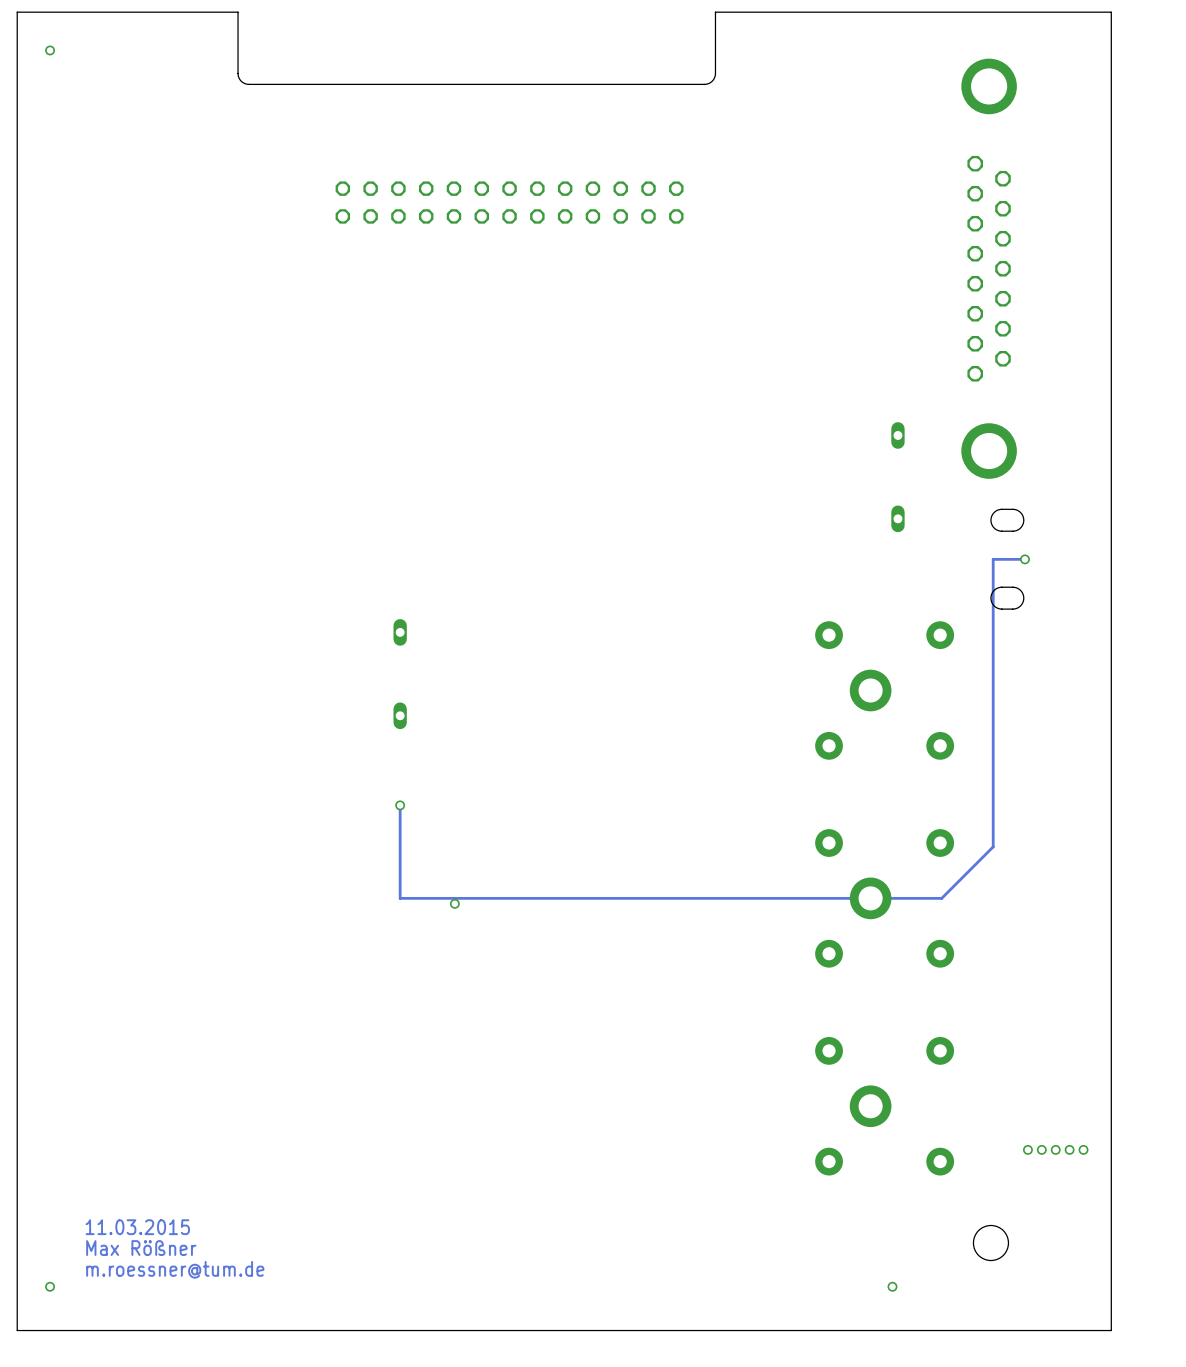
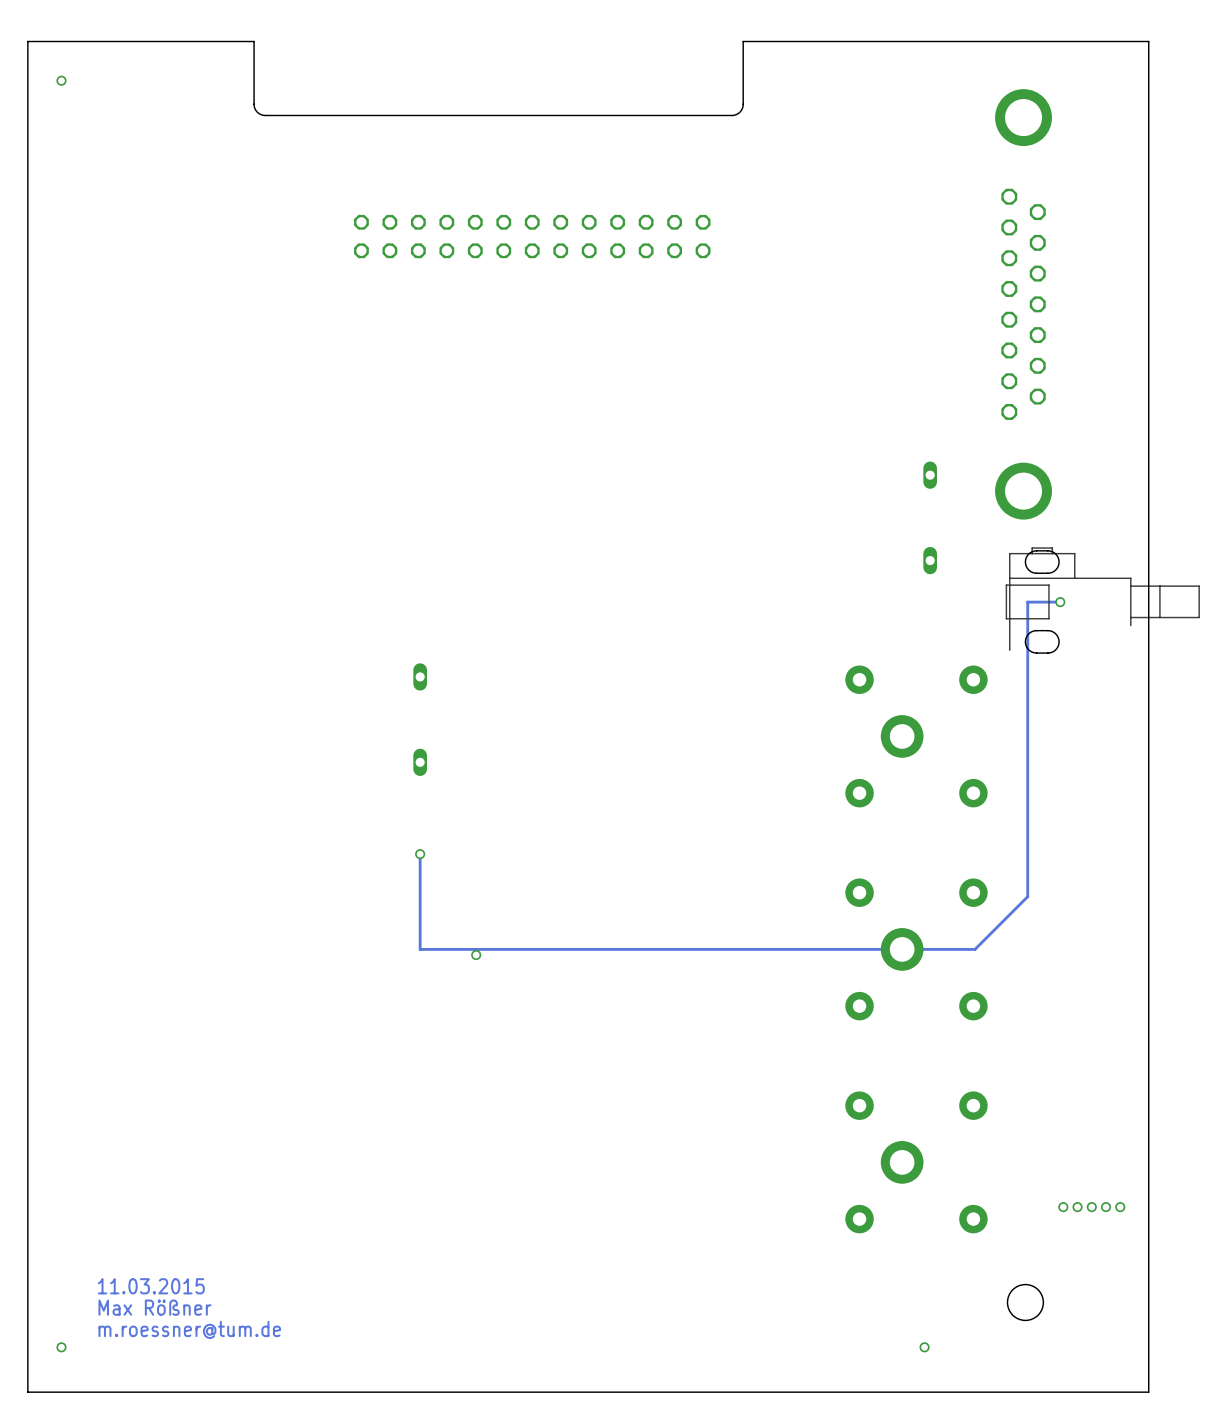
drawing: none -> [1005, 547, 1200, 654]
drawing: [990, 509, 1024, 610] -> none

